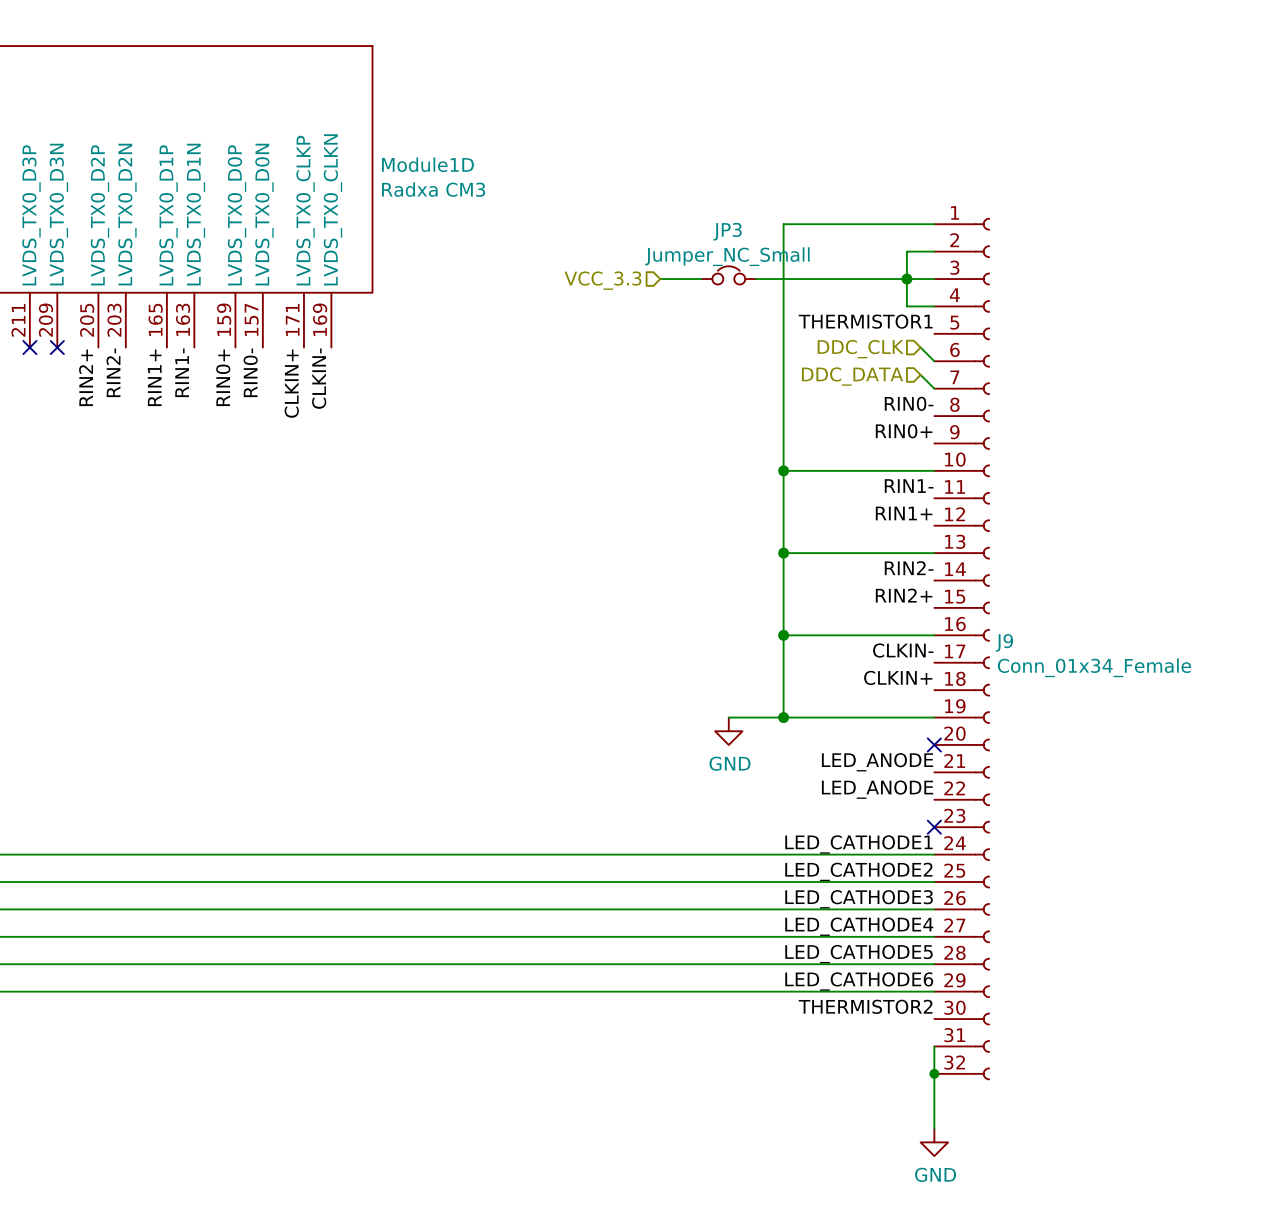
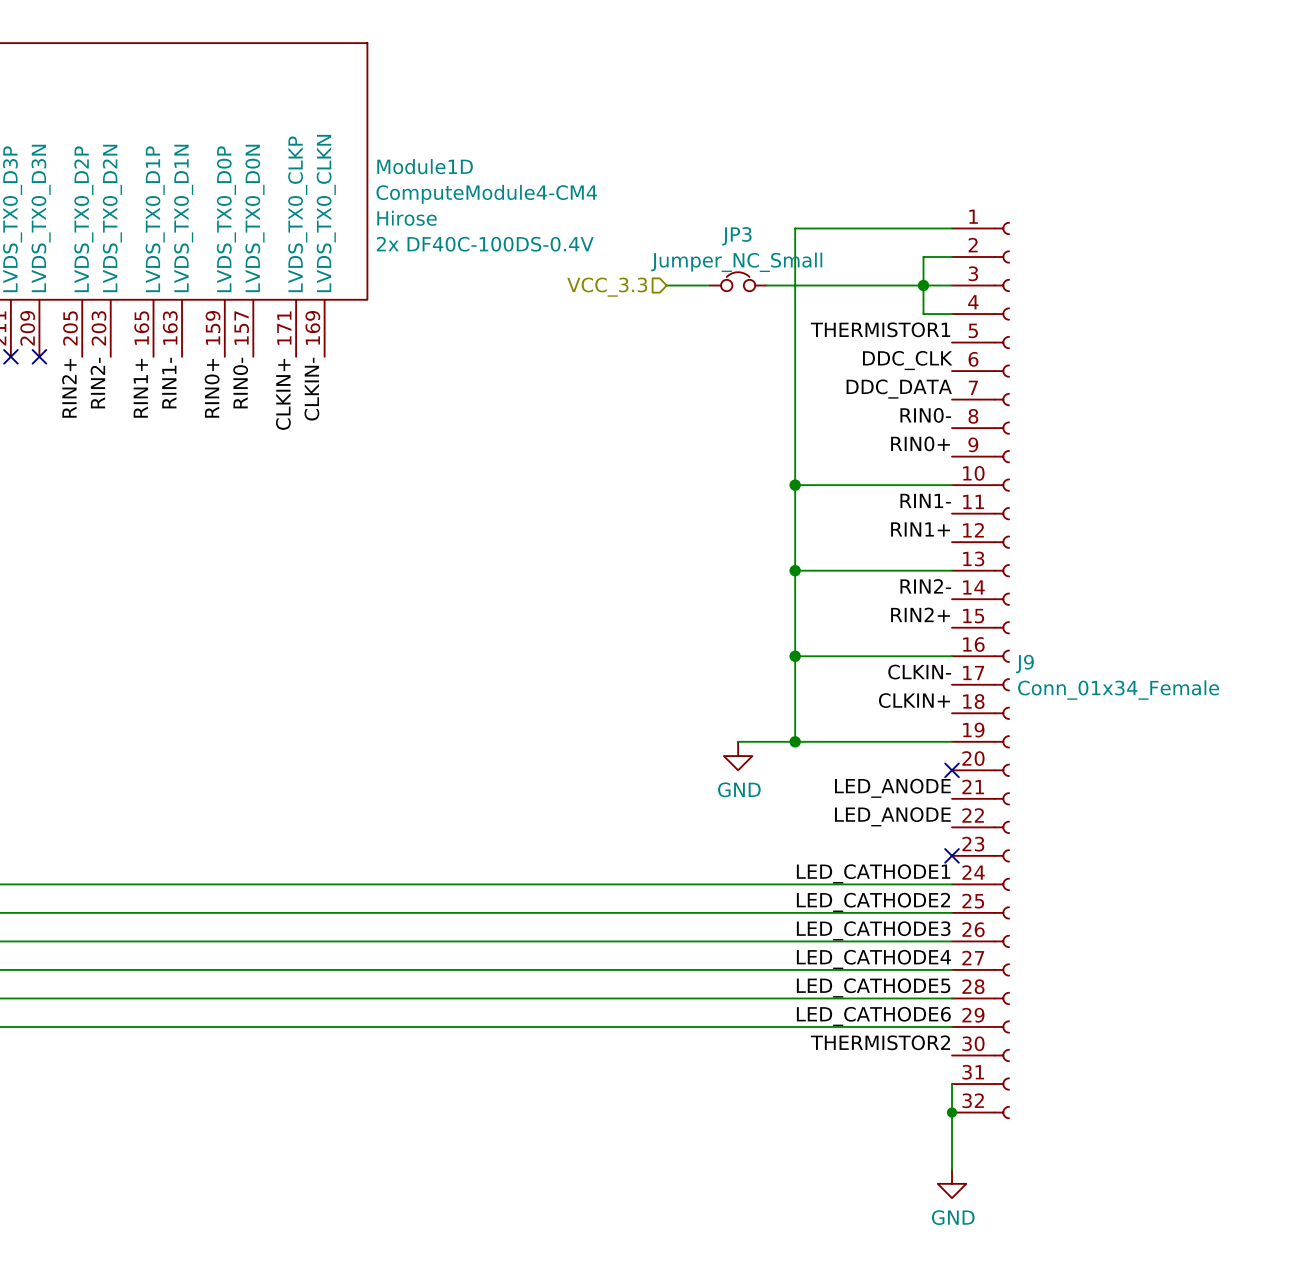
Module1D value: Radxa CM3 (433, 189) -> ComputeModule4-CM4 (486, 194)
Module1D text: none -> Hirose (407, 218)
Module1D text: none -> 2x DF40C-100DS-0.4V (485, 244)
wire: (920, 347) (934, 361) -> none
hierarchical label: DDC_CLK (860, 349) -> none
label: none -> DDC_CLK (907, 360)
wire: (920, 374) (934, 388) -> none
hierarchical label: DDC_DATA (852, 376) -> none
label: none -> DDC_DATA (899, 389)

